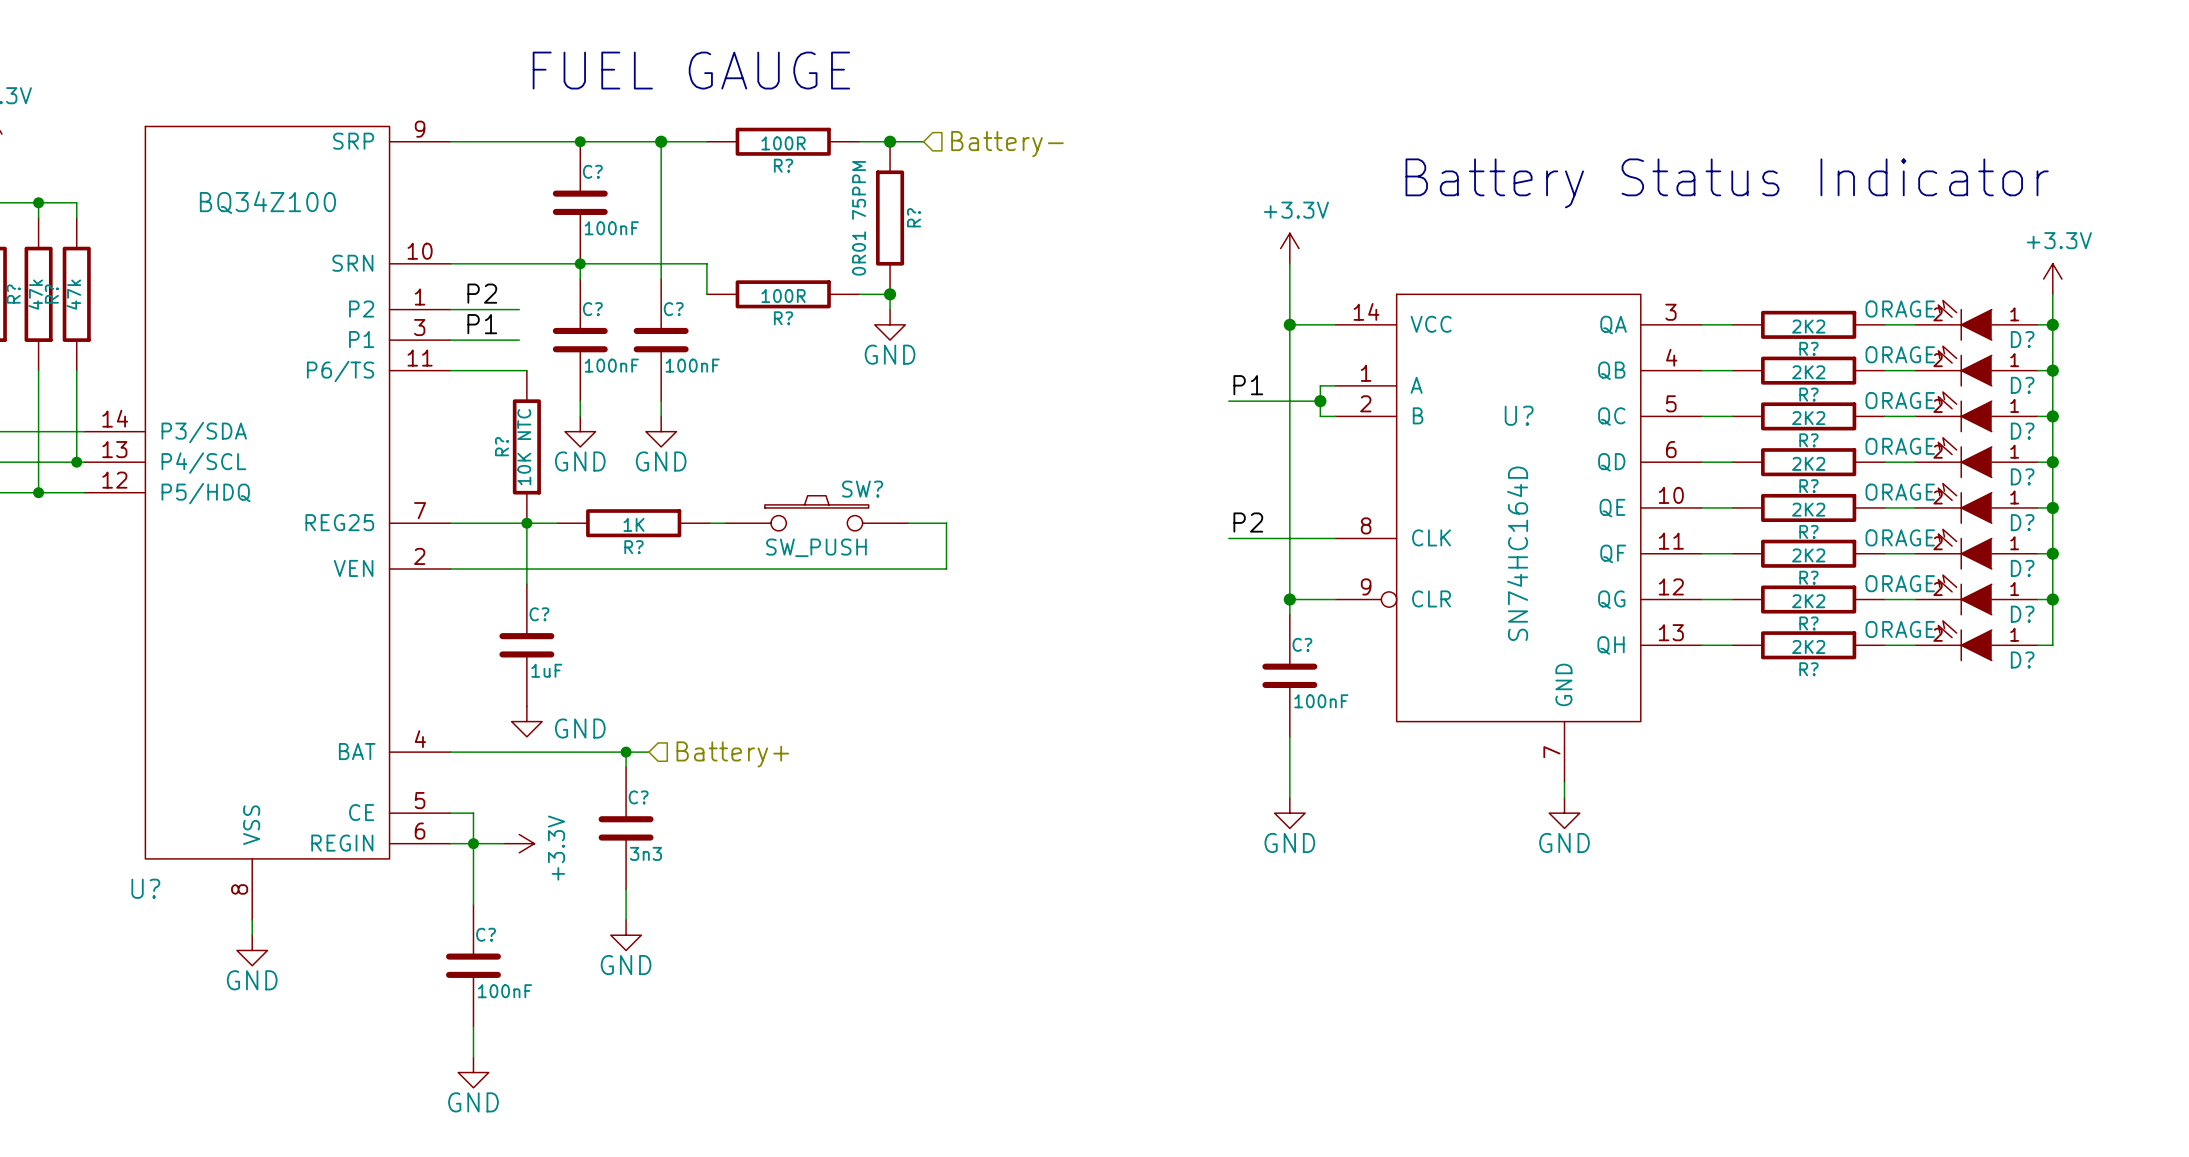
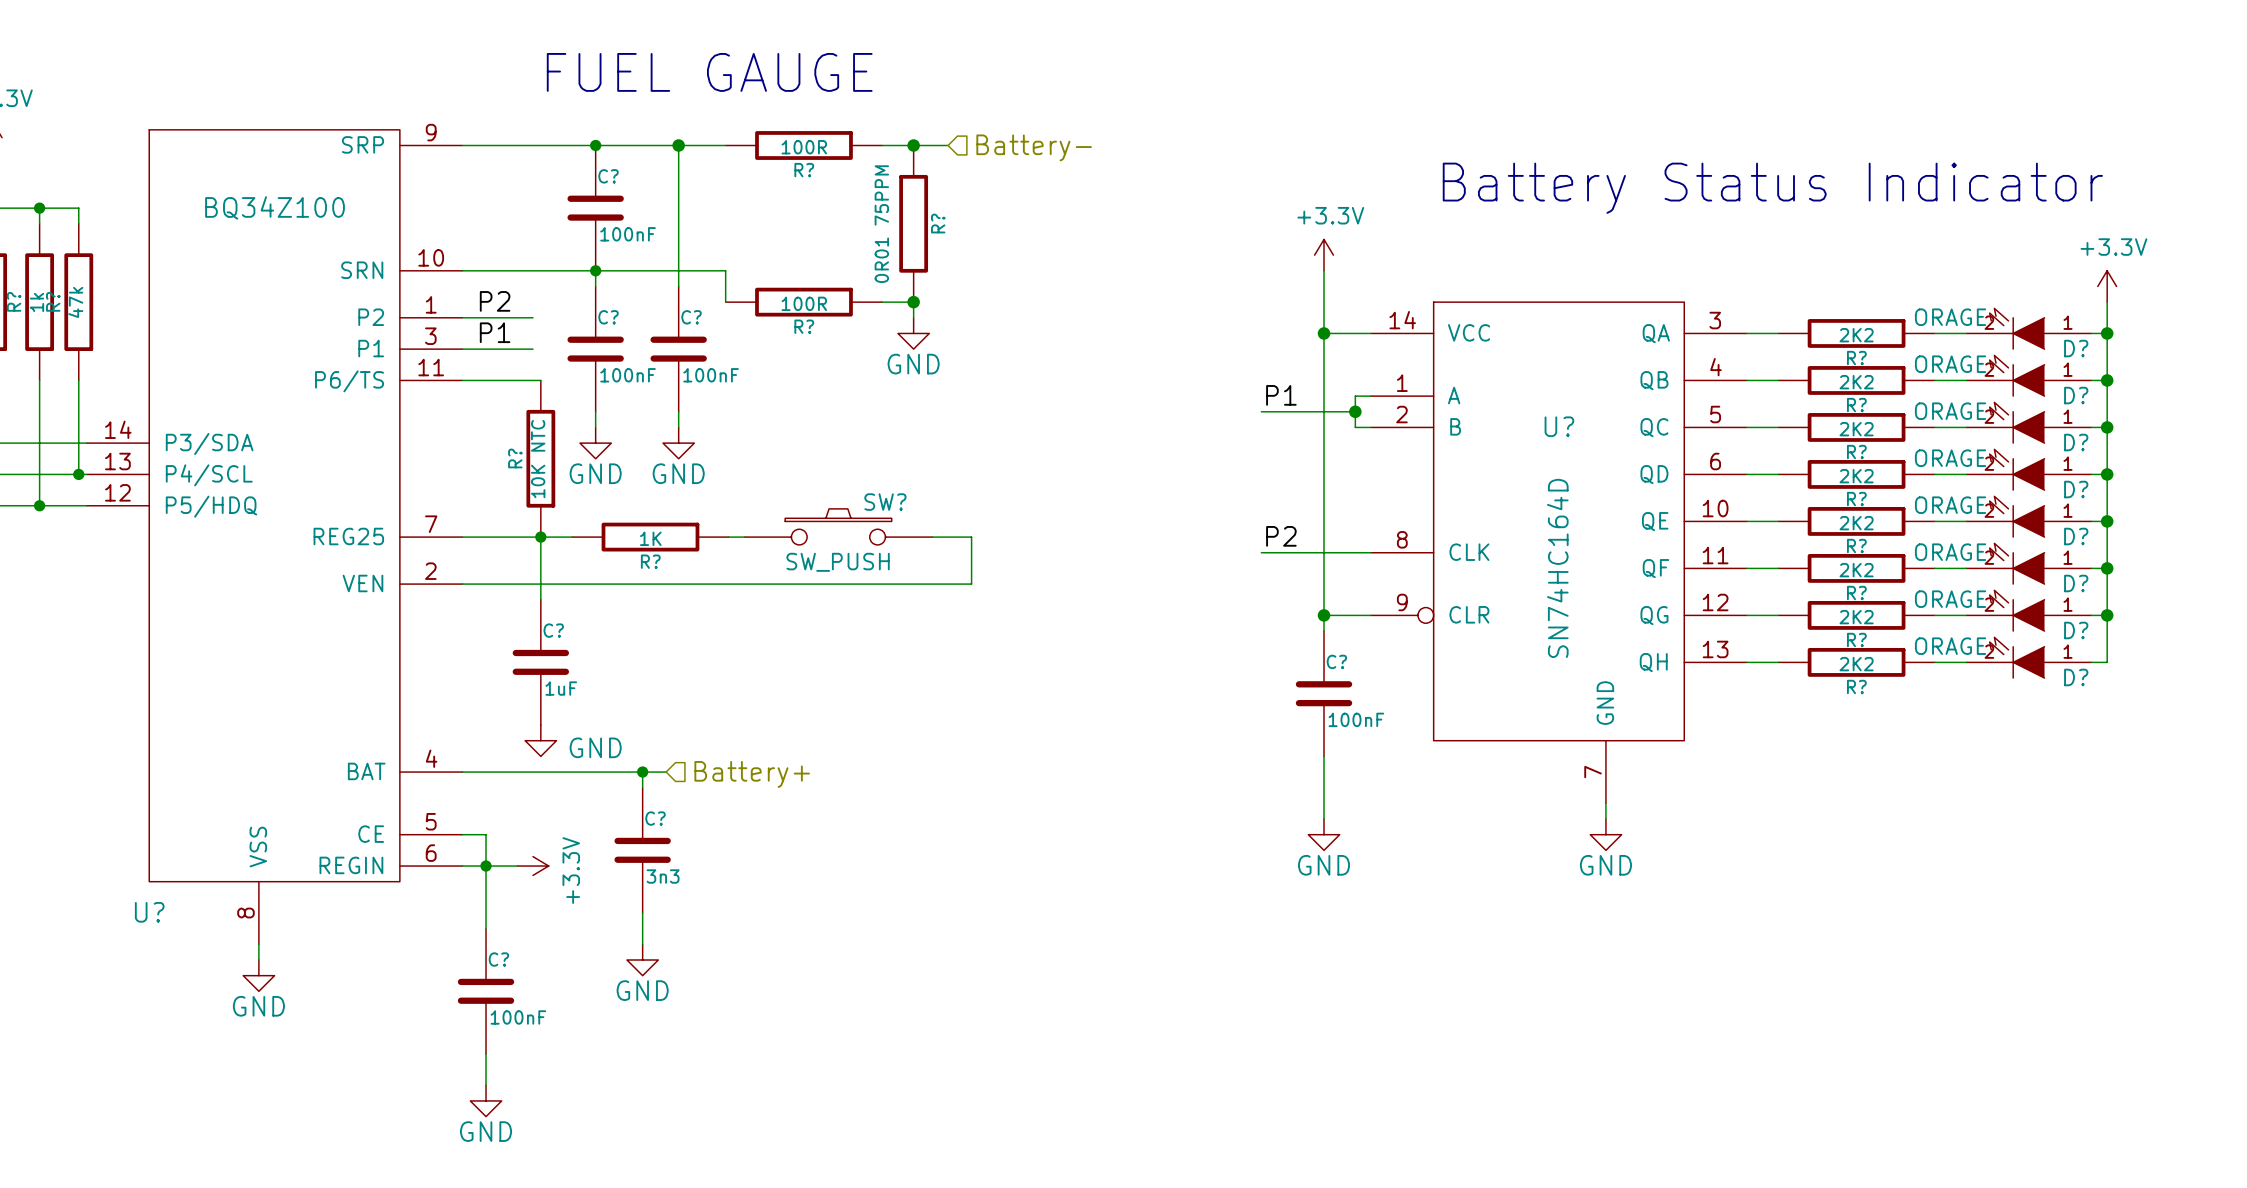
R? value: 47k (35, 294) -> 1k (36, 302)

